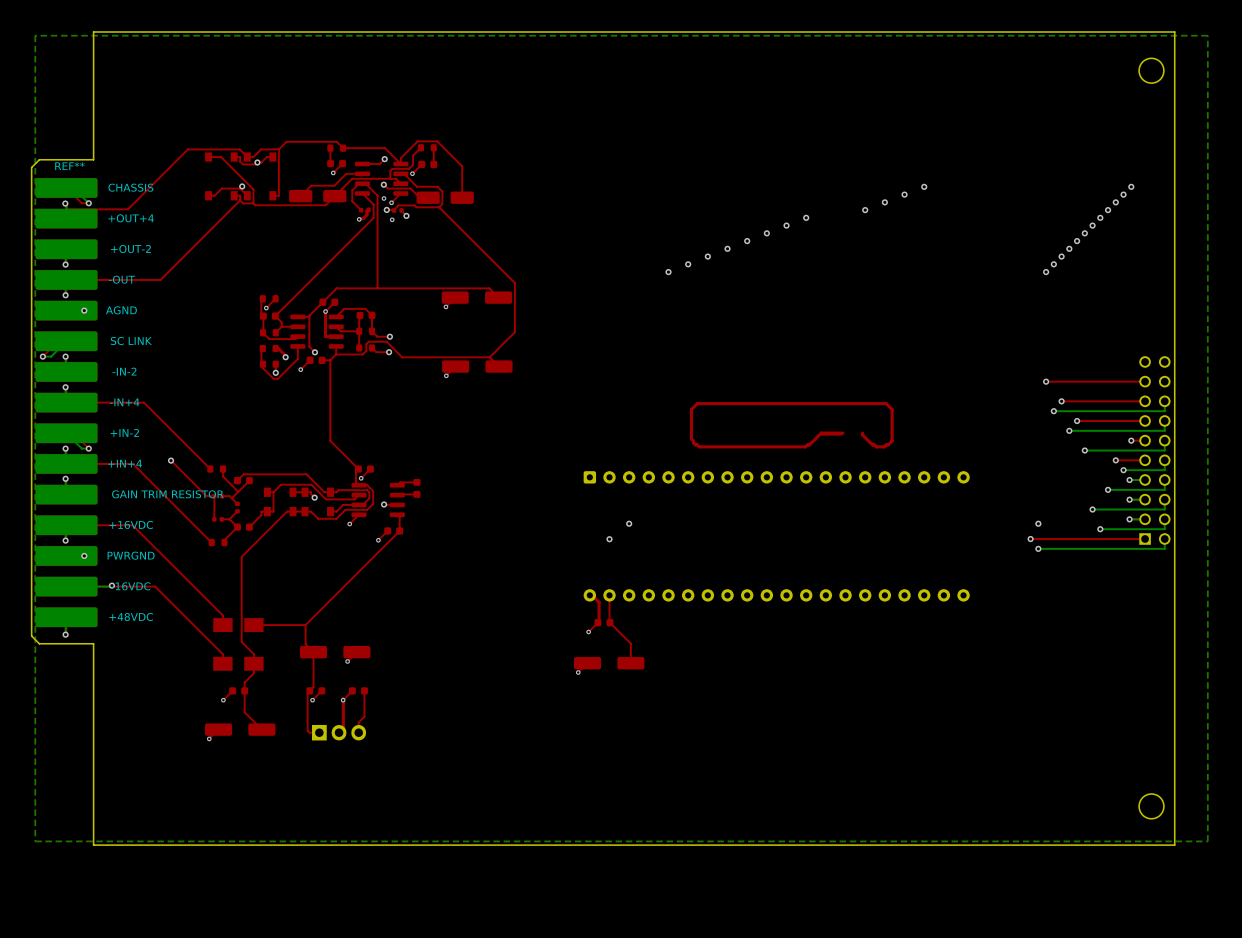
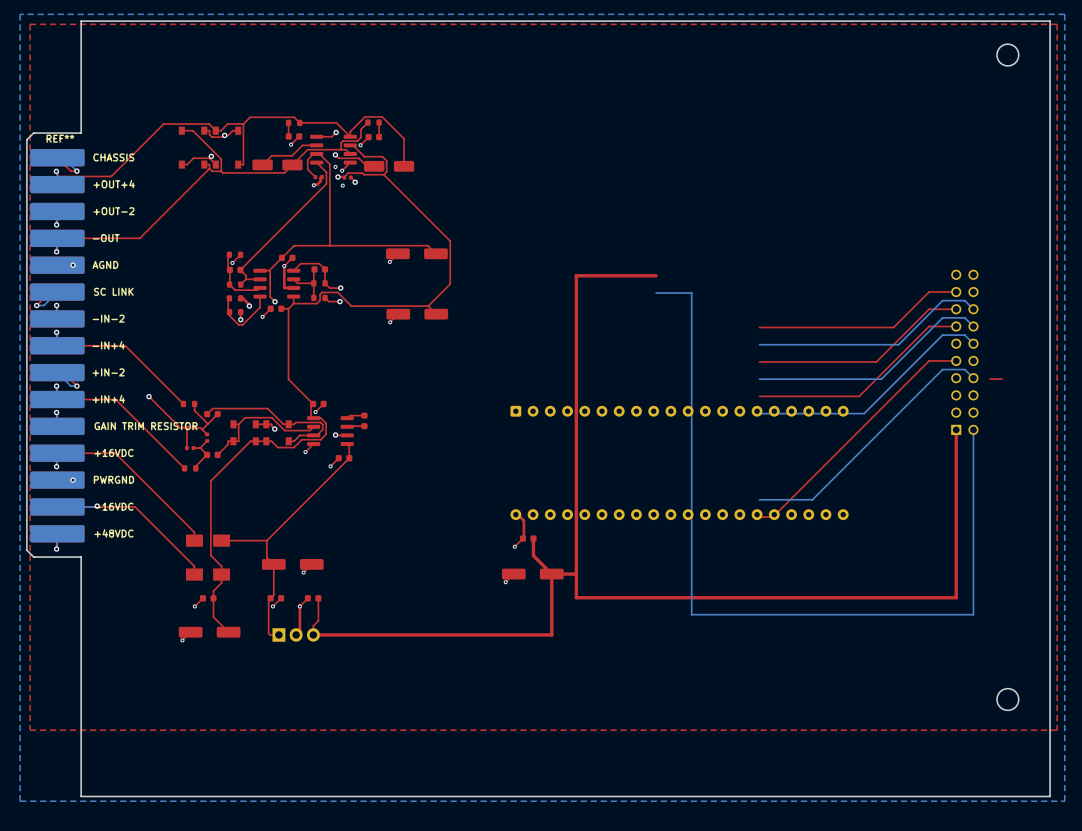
board edge: (1174, 32) (1174, 845) (93, 845) -> (1028, 21) (1050, 21) (1050, 796) (81, 796) (81, 733)
bottom zone outline: (1207, 35) (35, 35) (35, 841) (1207, 841) (1207, 35) -> (1064, 14) (1064, 801) (20, 801) (20, 14) (1064, 14)
via: (924, 186) -> none
via: (1131, 186) -> none
via: (904, 194) -> none
via: (1123, 194) -> none
via: (884, 202) -> none
via: (1115, 202) -> none
via: (865, 210) -> none
via: (1108, 210) -> none
via: (806, 217) -> none
via: (1100, 217) -> none
via: (786, 225) -> none
via: (1092, 225) -> none
via: (766, 233) -> none
via: (1084, 233) -> none
via: (747, 241) -> none
via: (1077, 241) -> none
via: (727, 248) -> none
via: (1069, 248) -> none
via: (707, 256) -> none
via: (1061, 256) -> none
via: (688, 264) -> none
via: (1053, 264) -> none
via: (668, 272) -> none
via: (1046, 272) -> none
top track: none -> (656, 275) (576, 275) (576, 597) (956, 597) (956, 429)
top track: none -> (956, 292) (929, 292) (893, 327) (759, 327)
bottom track: none -> (656, 293) (691, 293) (691, 614) (973, 614) (973, 429)
top track: none -> (956, 309) (929, 309) (876, 361) (759, 361)
bottom track: none -> (973, 309) (964, 300) (942, 300) (898, 344) (759, 344)
top track: none -> (956, 326) (929, 326) (859, 396) (759, 396)
bottom track: none -> (973, 326) (964, 317) (942, 317) (881, 379) (759, 379)
via: (1046, 381) -> none
top track: (1145, 381) (1046, 381) -> none
bottom track: none -> (973, 343) (964, 335) (942, 335) (864, 413) (759, 413)
via: (1061, 401) -> none
top track: (1145, 401) (1061, 401) -> none
bottom track: (1164, 401) (1164, 411) (1053, 411) -> none
via: (1053, 411) -> none
top track: none -> (956, 360) (929, 360) (773, 517) (759, 517)
via: (1077, 421) -> none
top track: (1145, 421) (1077, 421) -> none
bottom track: (1164, 421) (1164, 430) (1069, 430) -> none
via: (1069, 430) -> none
top track: (862, 433) (876, 446) (888, 444) (892, 440) (892, 409) (886, 403) (697, 403) (691, 409) (691, 439) (699, 446) (805, 446) (821, 433) (842, 433) -> none
top track: (841, 434) (821, 434) -> none
bottom track: none -> (973, 378) (964, 369) (942, 369) (812, 499) (759, 499)
via: (1131, 440) -> none
bottom track: (1164, 440) (1164, 450) (1084, 450) -> none
via: (1084, 450) -> none
part position: (1154, 450) -> (964, 352)
via: (1115, 460) -> none
top track: (1145, 460) (1115, 460) -> none
bottom track: (1164, 460) (1164, 470) (1123, 470) -> none
via: (1123, 470) -> none
via: (1129, 480) -> none
bottom track: (1145, 480) (1129, 480) -> none
bottom track: (1164, 480) (1164, 489) (1108, 489) -> none
via: (1108, 489) -> none
via: (1129, 499) -> none
bottom track: (1145, 499) (1129, 499) -> none
bottom track: (1164, 499) (1164, 509) (1092, 509) -> none
via: (1092, 509) -> none
via: (1129, 519) -> none
bottom track: (1145, 519) (1129, 519) -> none
bottom track: (1164, 519) (1164, 529) (1100, 529) -> none
via: (629, 523) -> none
via: (1038, 523) -> none
via: (1100, 529) -> none
via: (609, 539) -> none
via: (1030, 539) -> none
top track: (1145, 539) (1030, 539) -> none
bottom track: (1164, 539) (1164, 548) (1038, 548) -> none
via: (1038, 548) -> none
top track: (609, 595) (609, 622) (630, 643) (630, 663) -> (533, 538) (533, 555) (551, 574)
top track: none -> (551, 574) (551, 634) (313, 634)
top track: none -> (576, 574) (551, 574)

